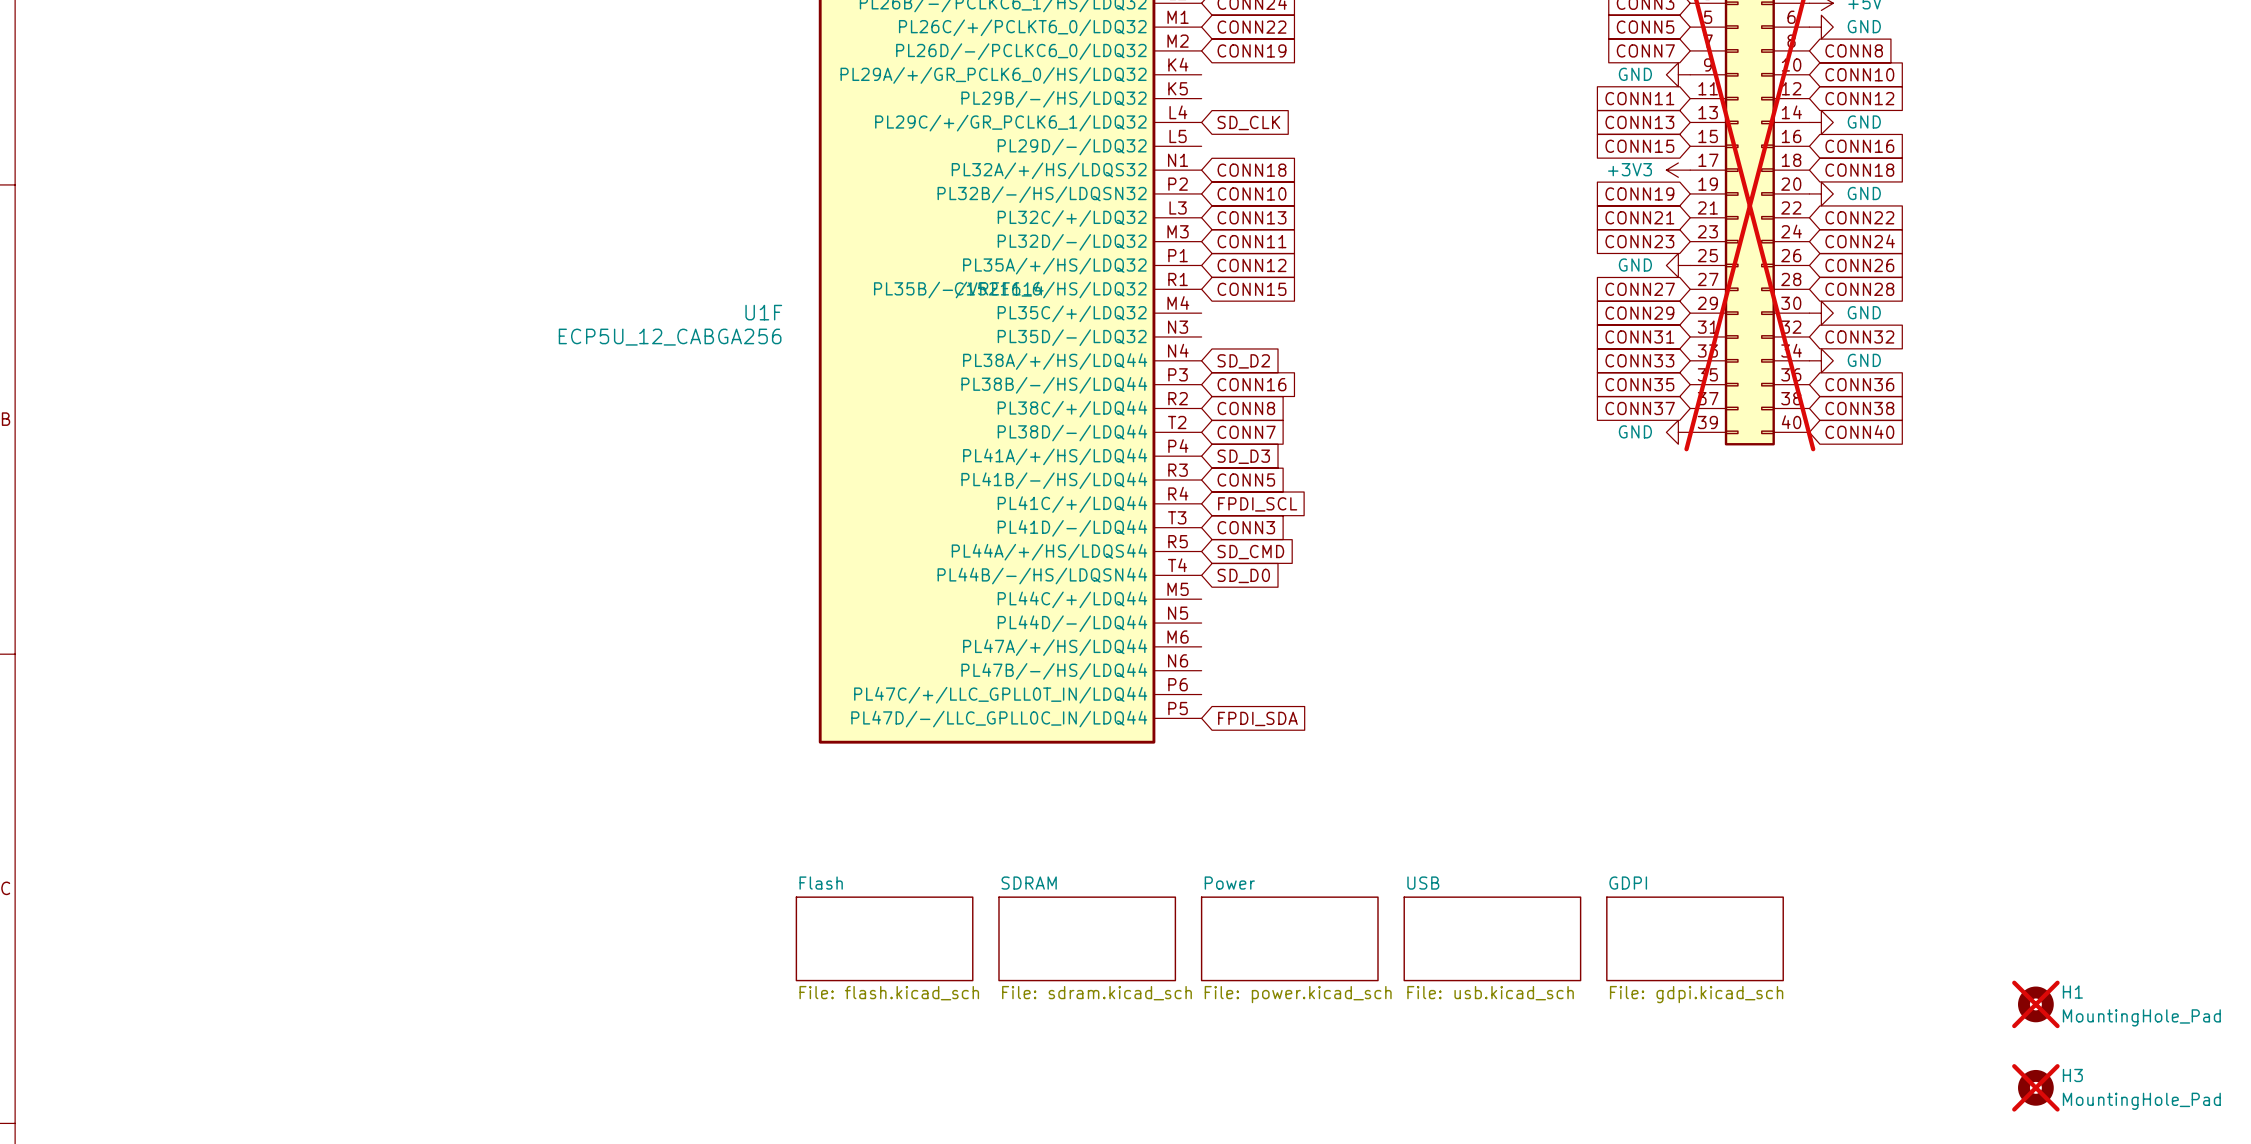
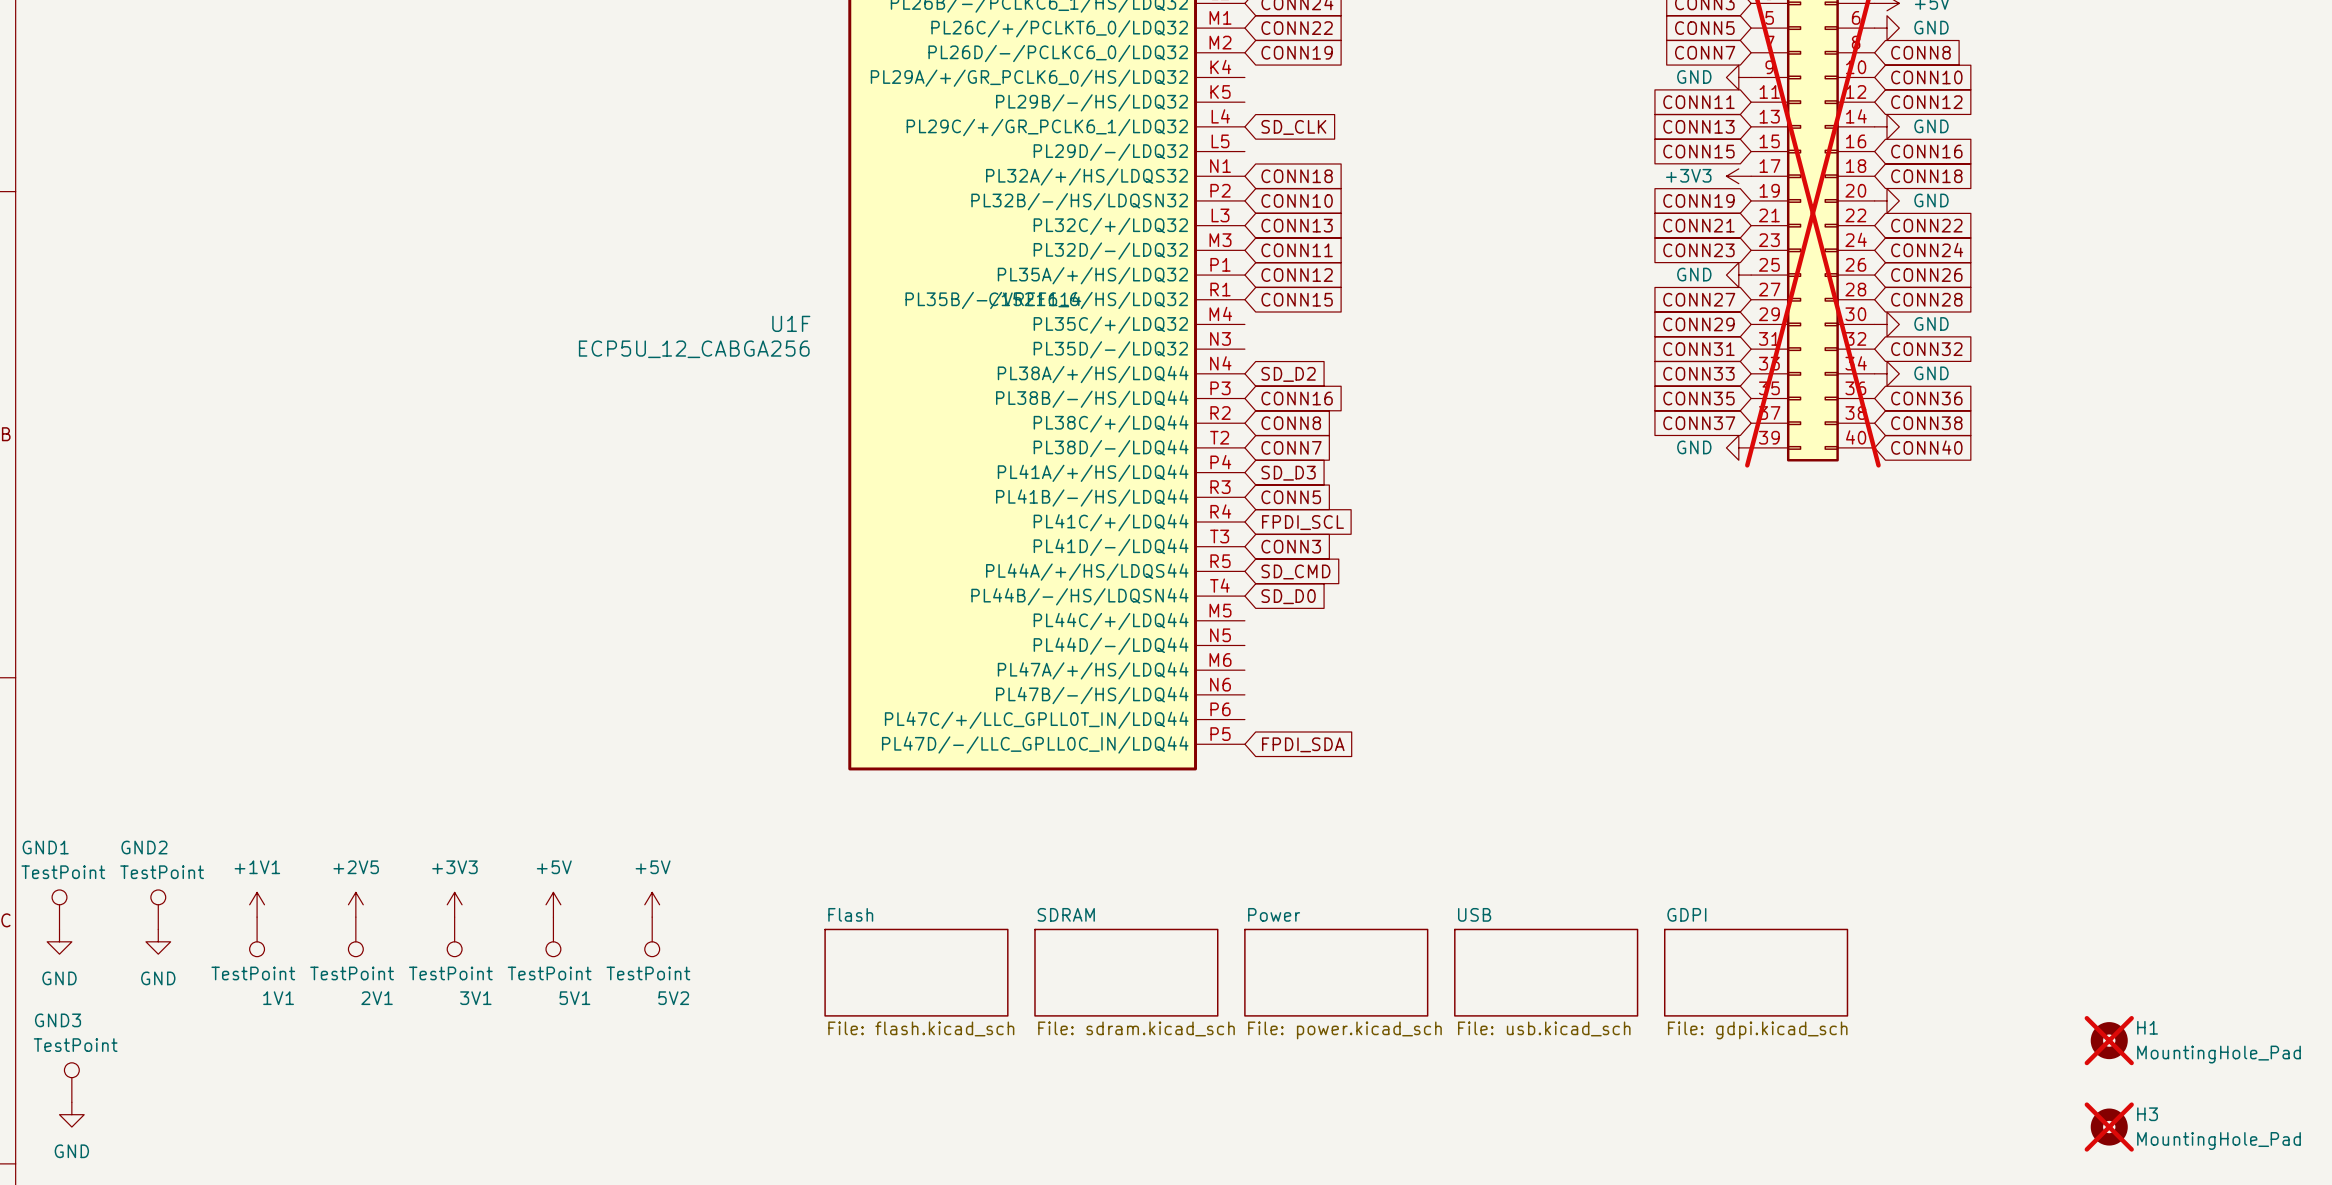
power symbol: none -> +1V1 (257, 904)
power symbol: none -> +2V5 (355, 904)
power symbol: none -> +3V3 (454, 904)
power symbol: none -> +5V (553, 904)
power symbol: none -> +5V (652, 904)
GND1: none -> TestPoint (59, 909)
GND2: none -> TestPoint (158, 909)
1V1: none -> TestPoint (257, 936)
2V1: none -> TestPoint (355, 936)
3V1: none -> TestPoint (454, 936)
5V1: none -> TestPoint (553, 936)
5V2: none -> TestPoint (652, 936)
power symbol: none -> GND (59, 941)
power symbol: none -> GND (158, 941)
GND3: none -> TestPoint (71, 1082)
power symbol: none -> GND (71, 1114)

